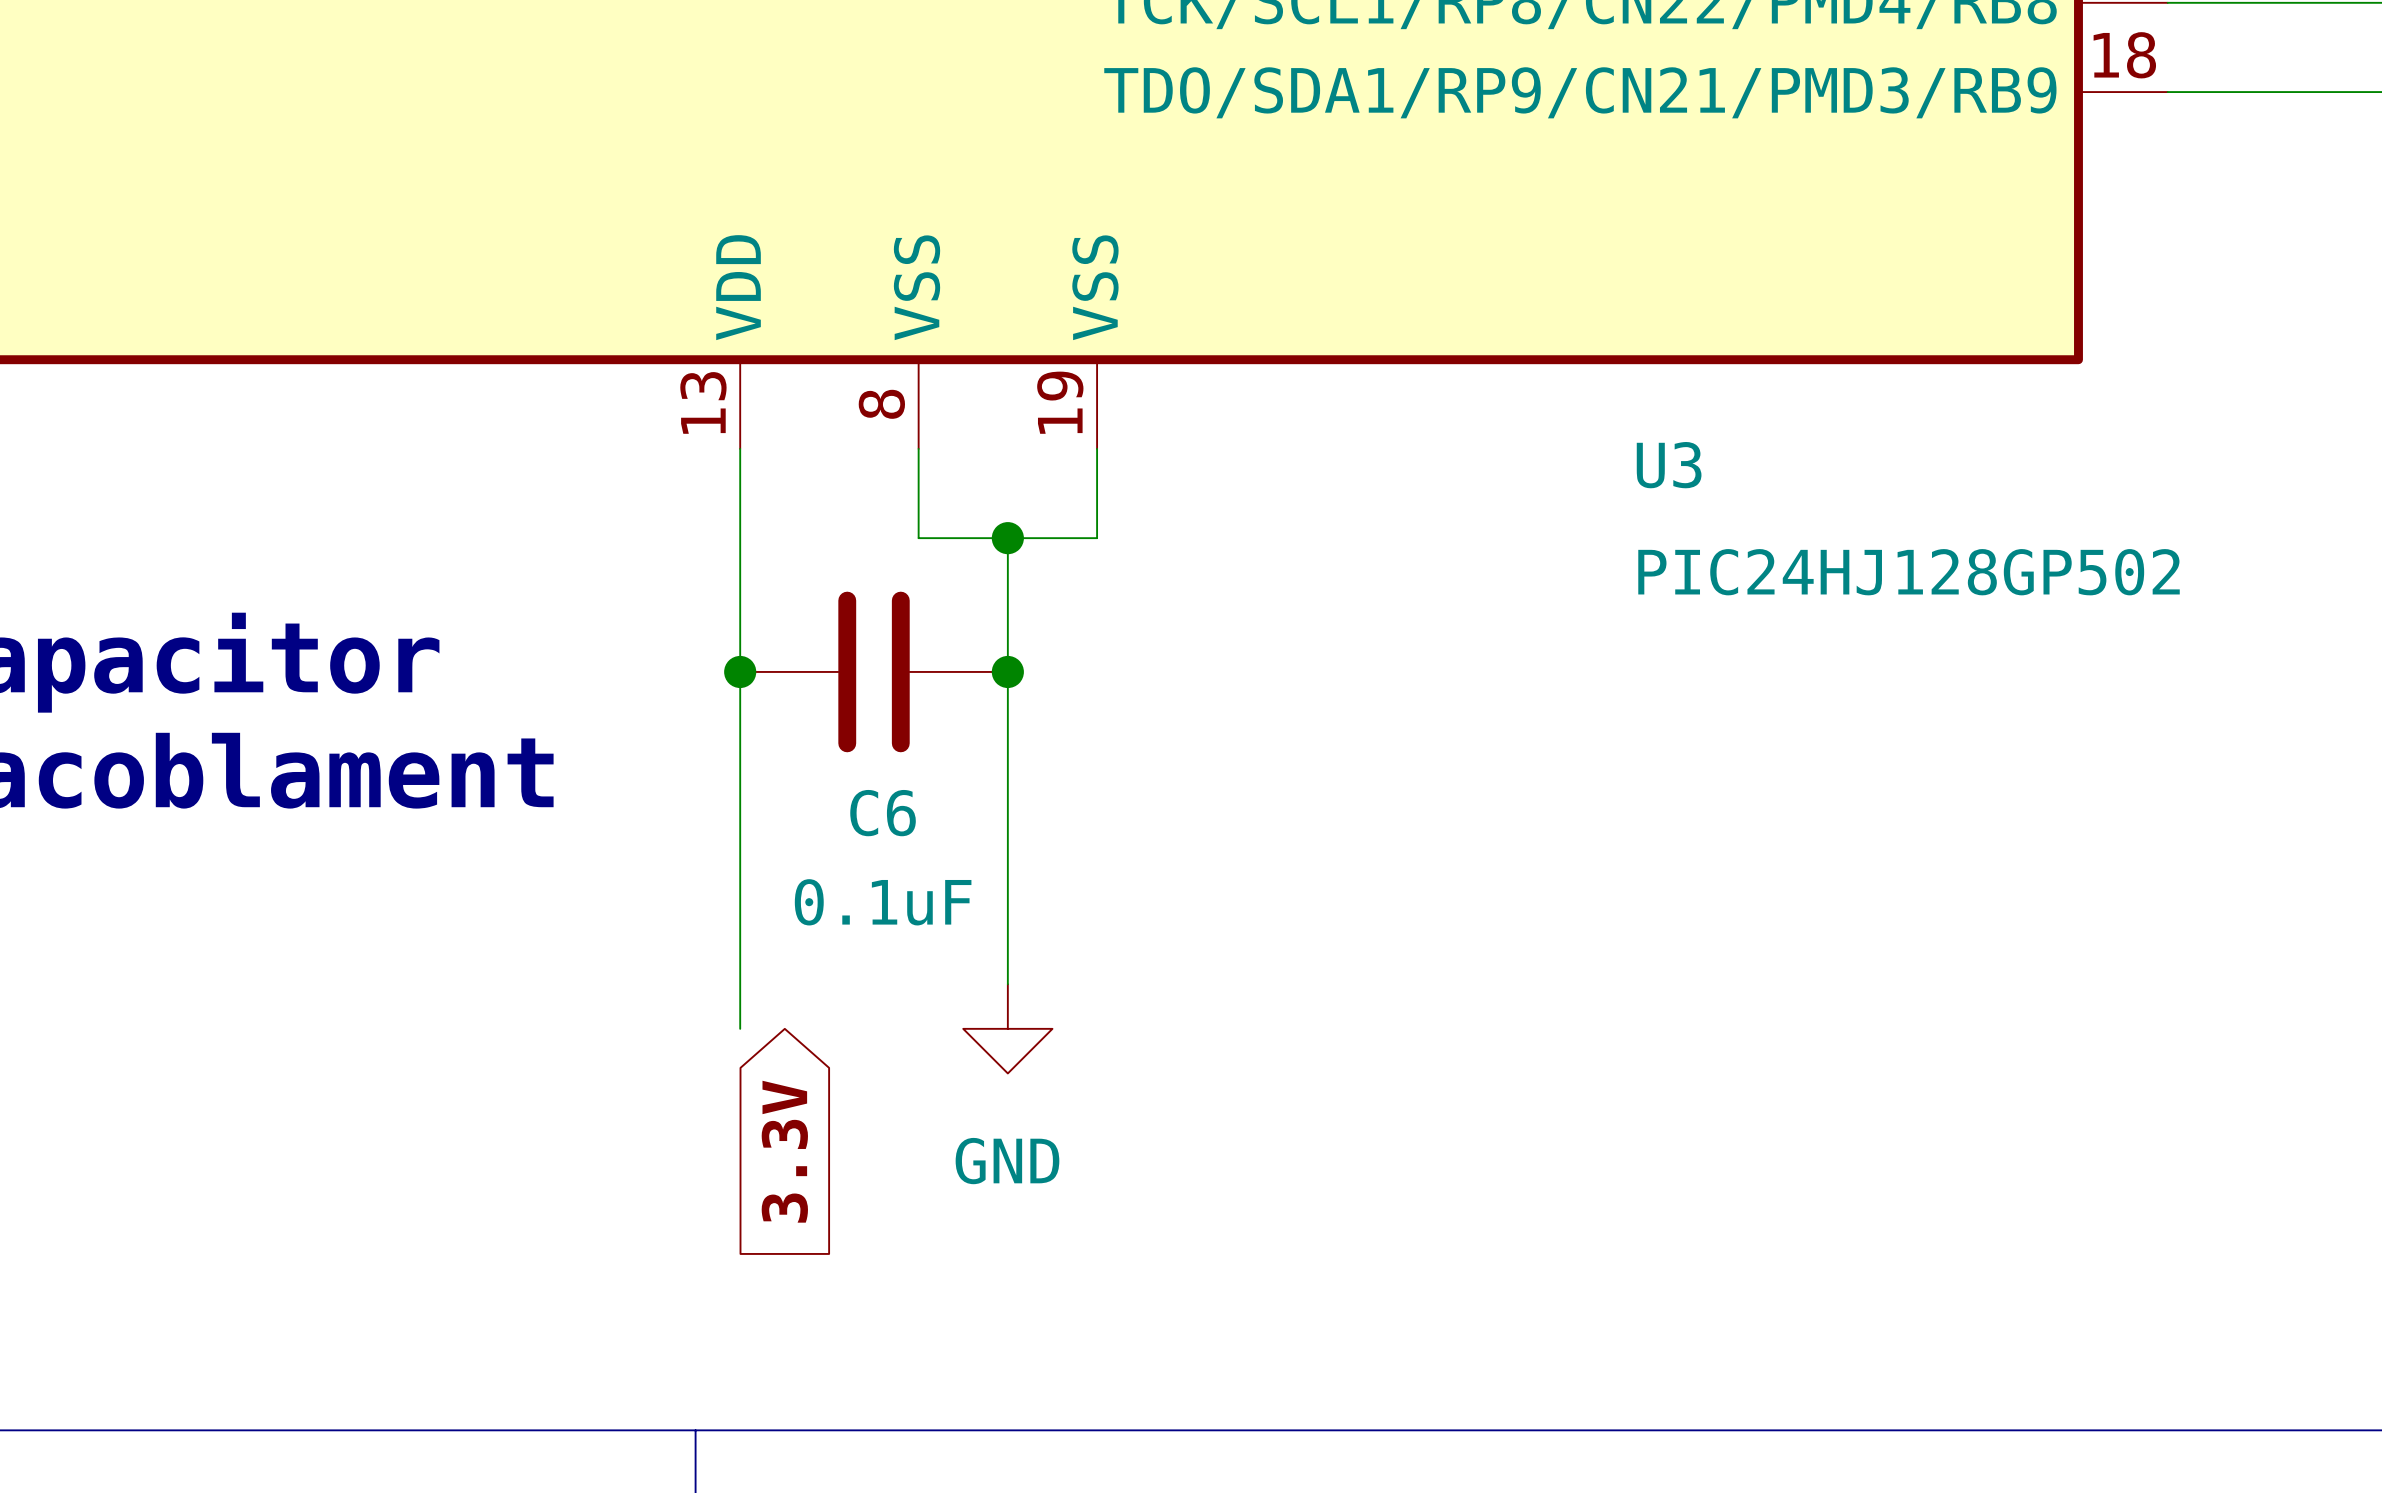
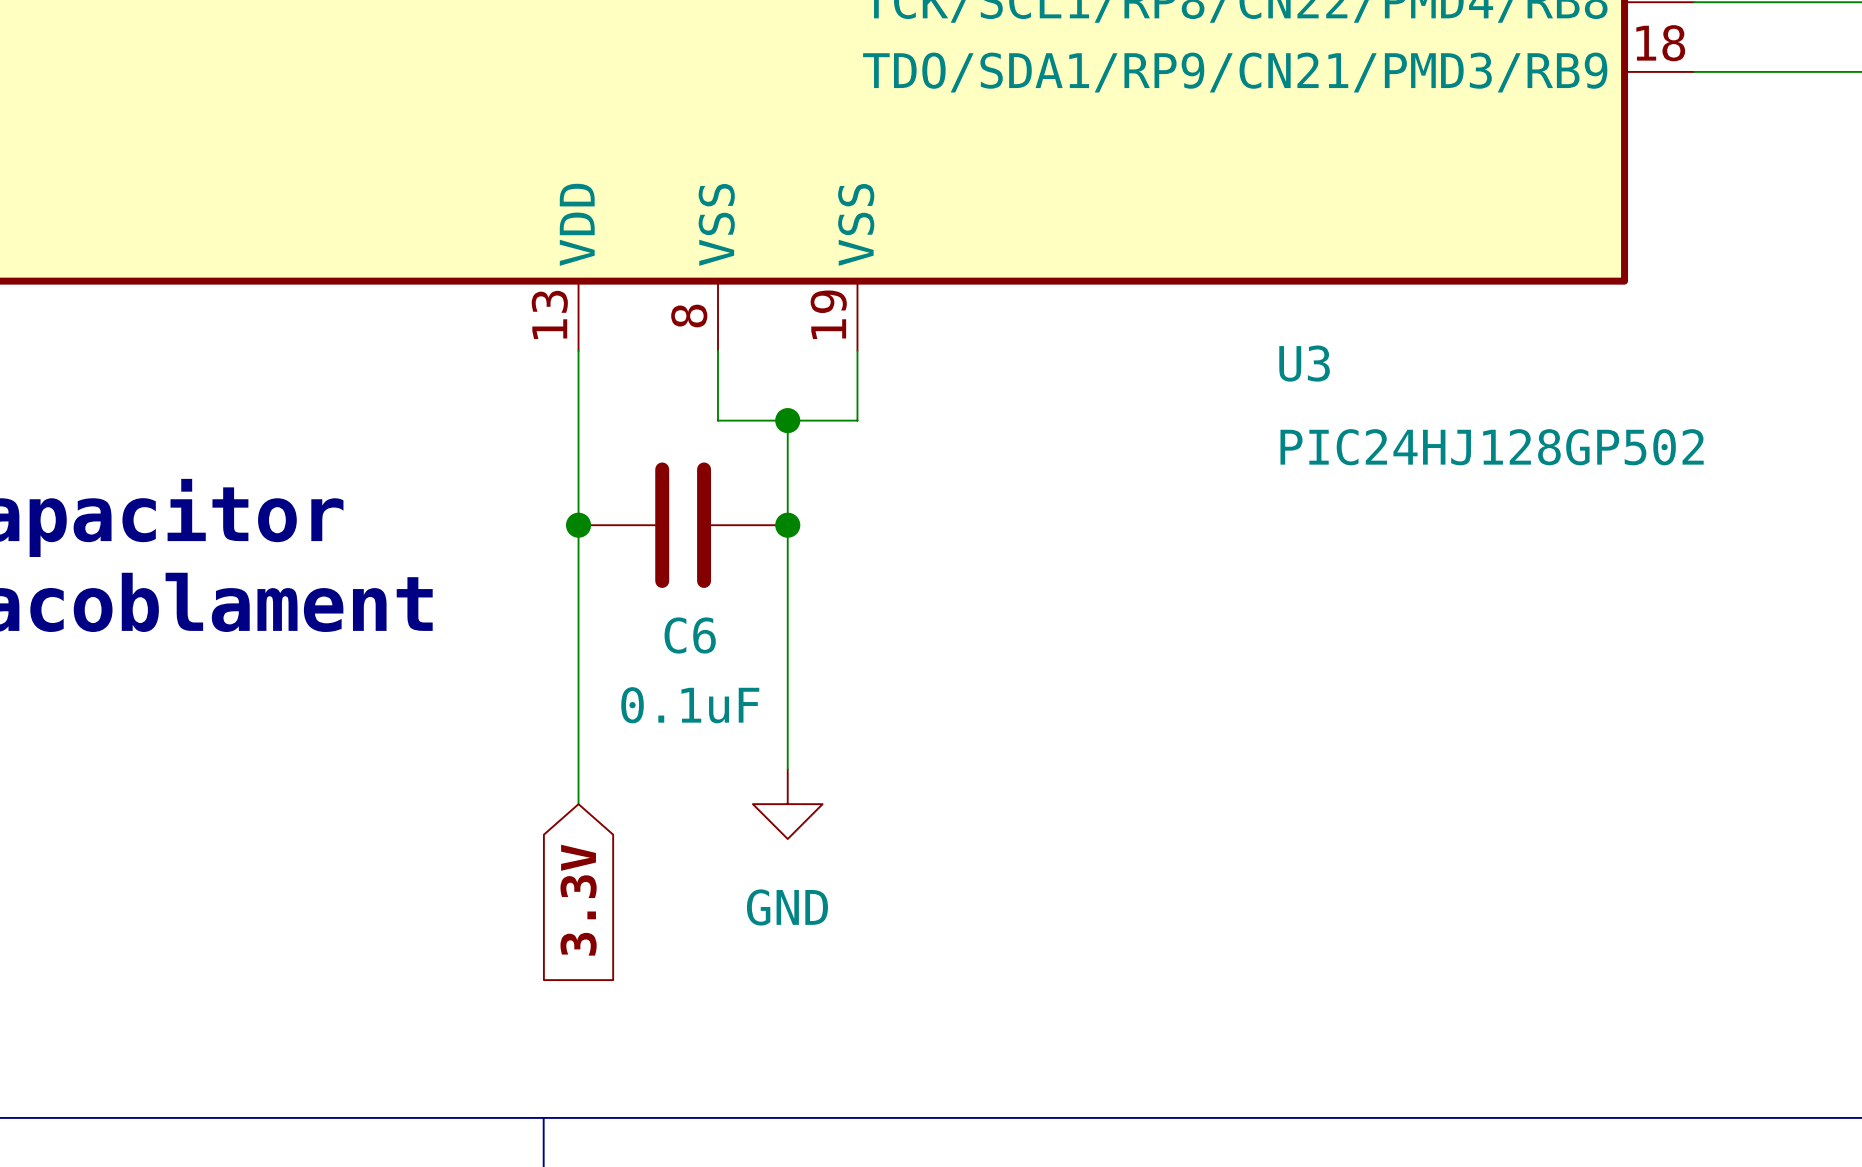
global label position: 3.3V (784, 1151) -> 3.3V (578, 900)

